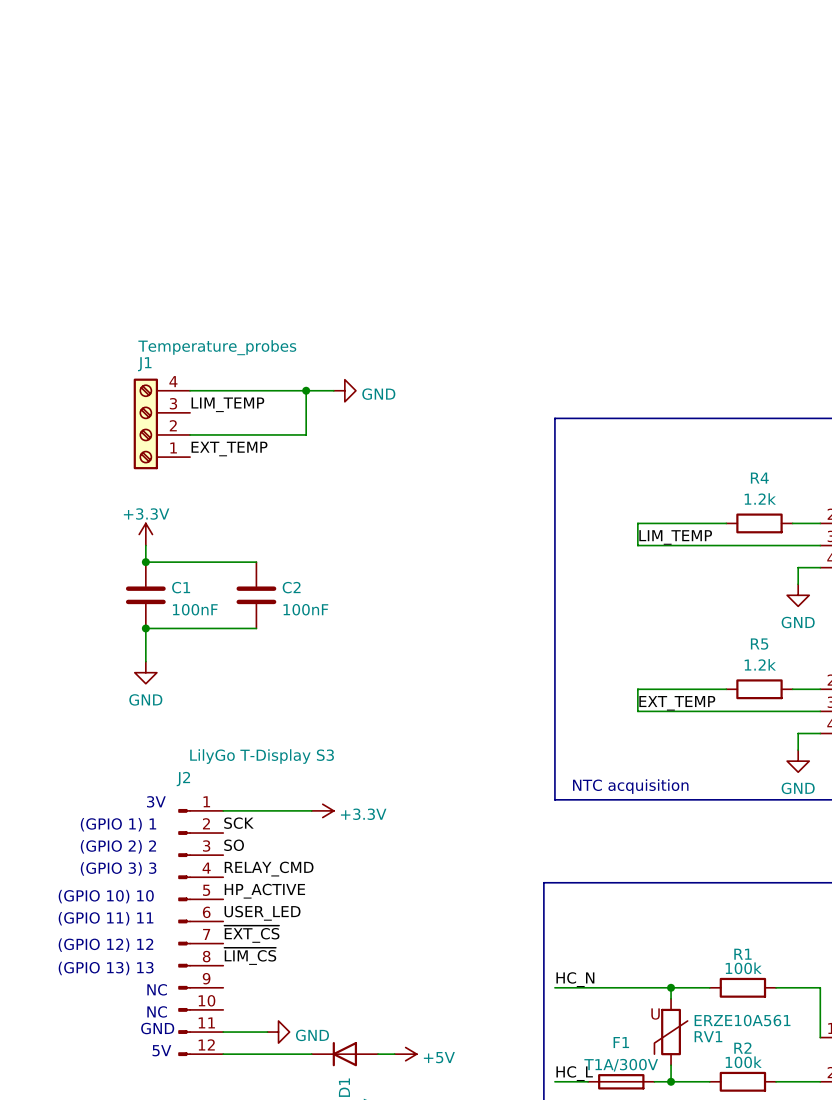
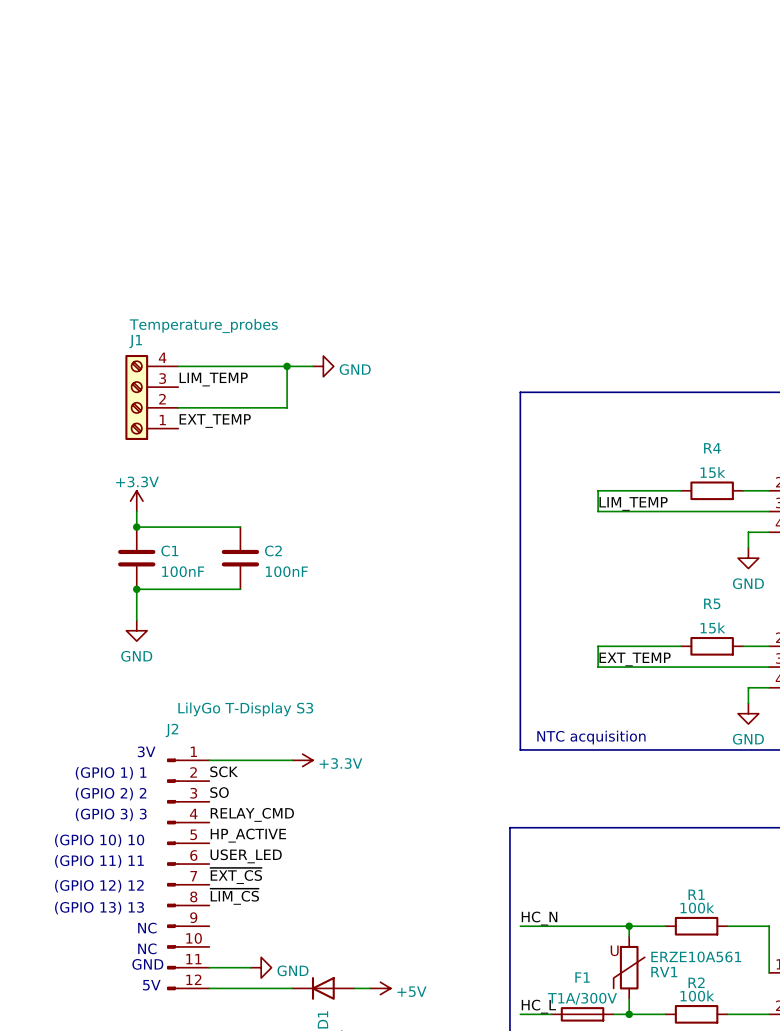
R4 value: 1.2k (760, 498) -> 15k (712, 472)
R5 value: 1.2k (760, 664) -> 15k (712, 628)

